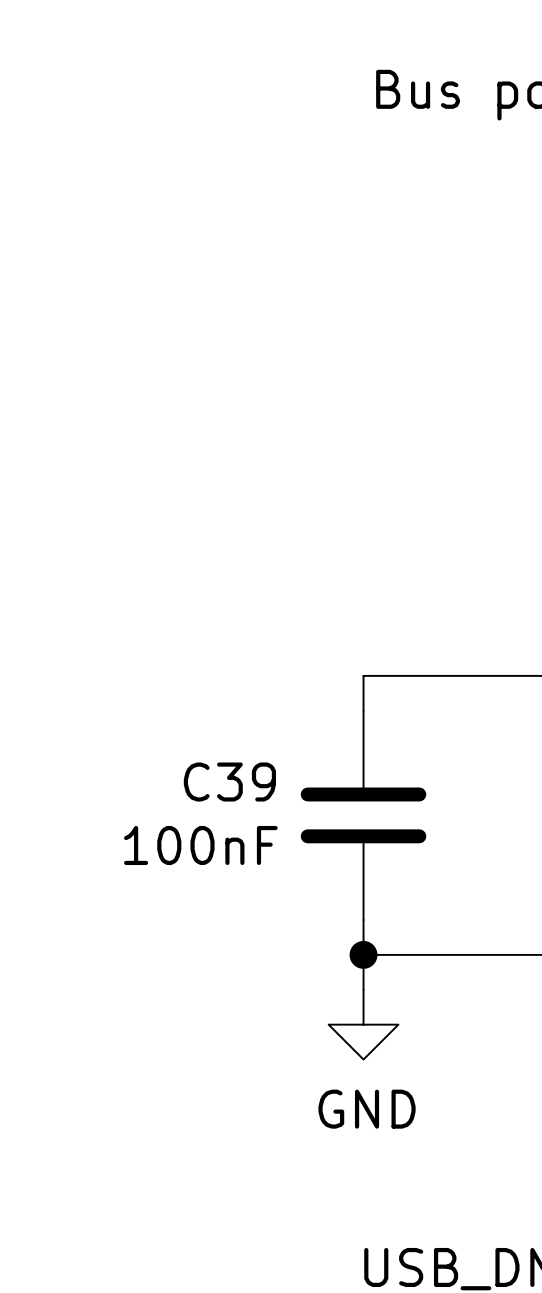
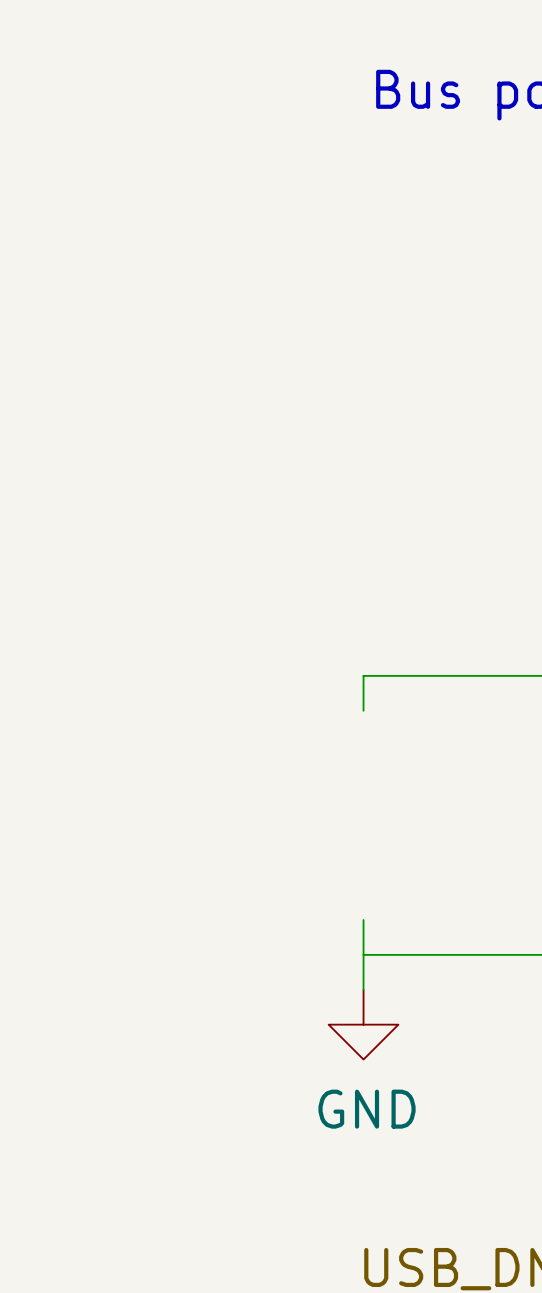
C39: 100nF (363, 815) -> none
junction: (363, 954) -> none

